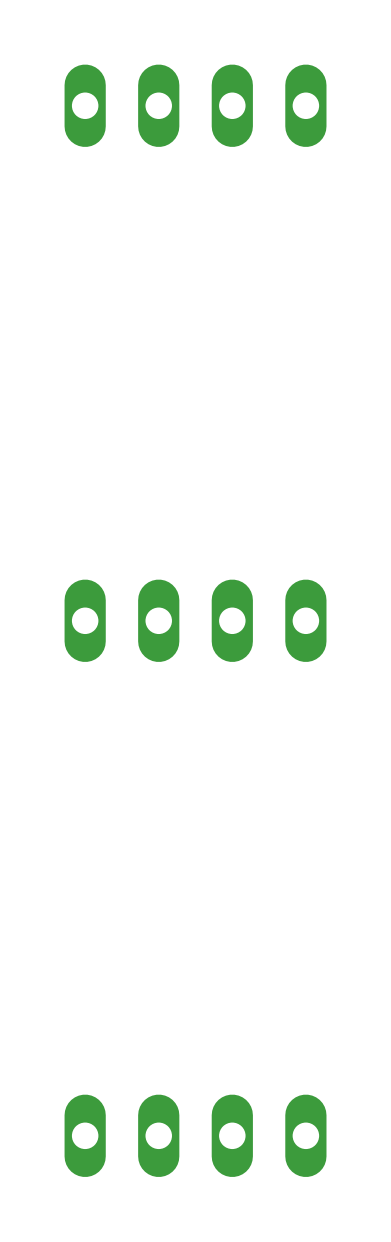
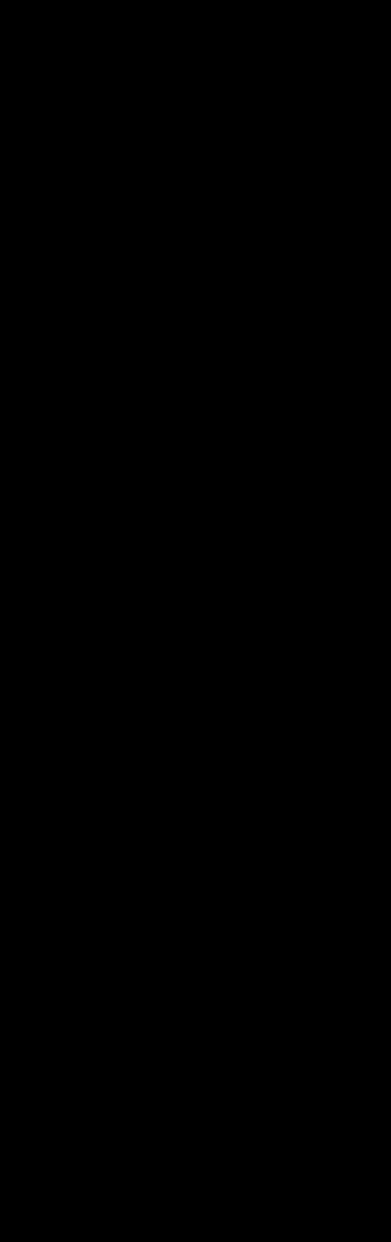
part: (195, 105) -> none
part: (195, 620) -> none
part: (195, 1135) -> none

